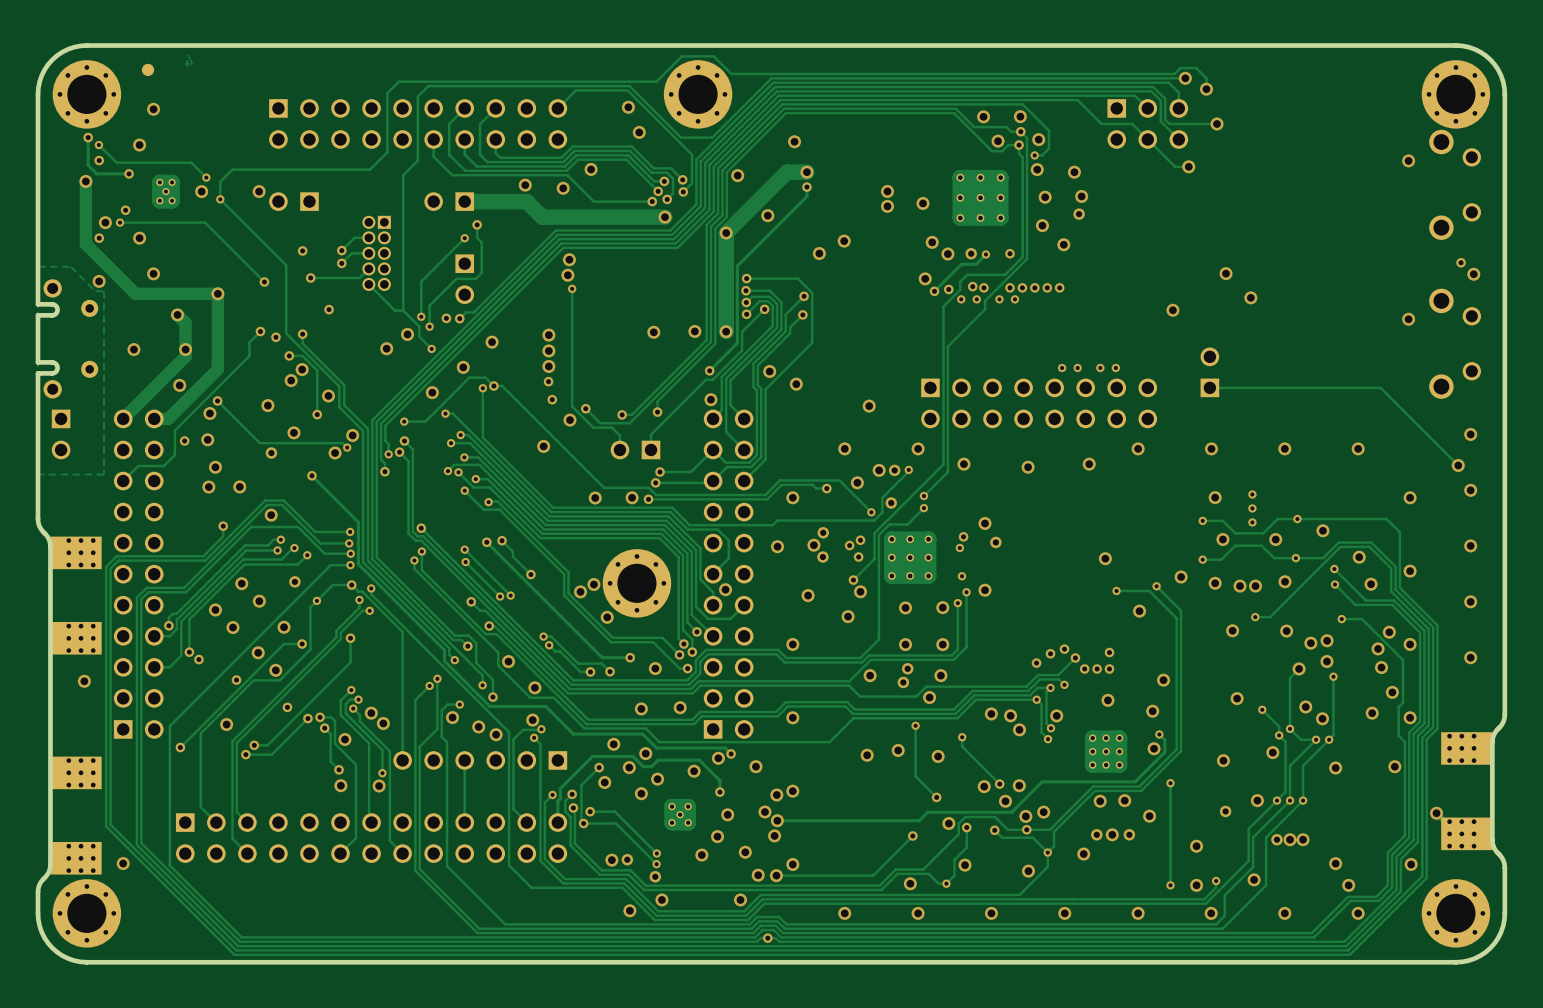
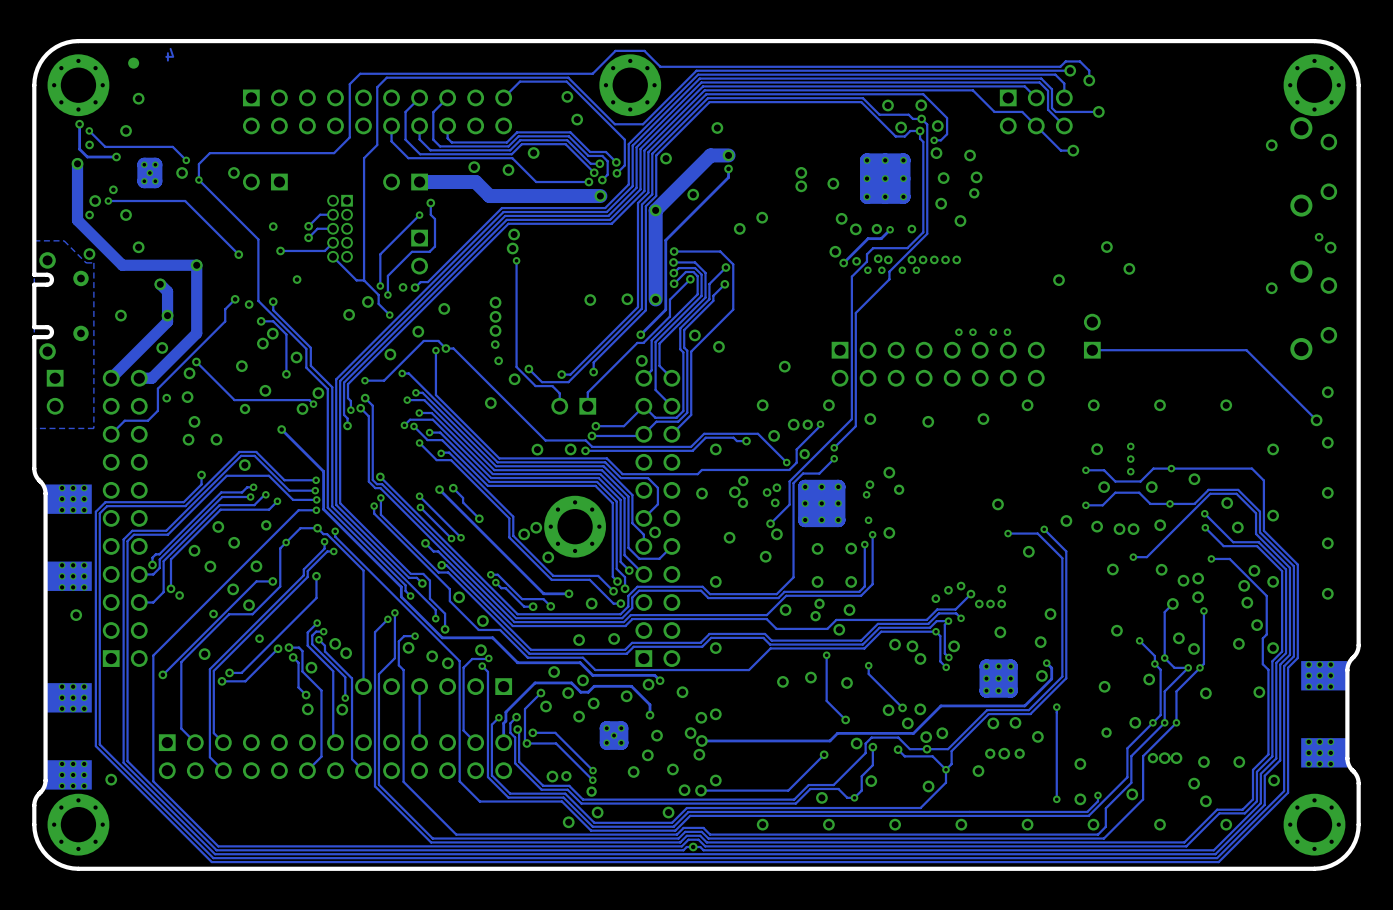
via: (1436, 813) -> none
via: none -> (1203, 762)
via: none -> (1239, 762)
via: (1335, 863) -> none
via: none -> (1194, 783)
via: (1348, 885) -> none
via: none -> (1205, 801)

